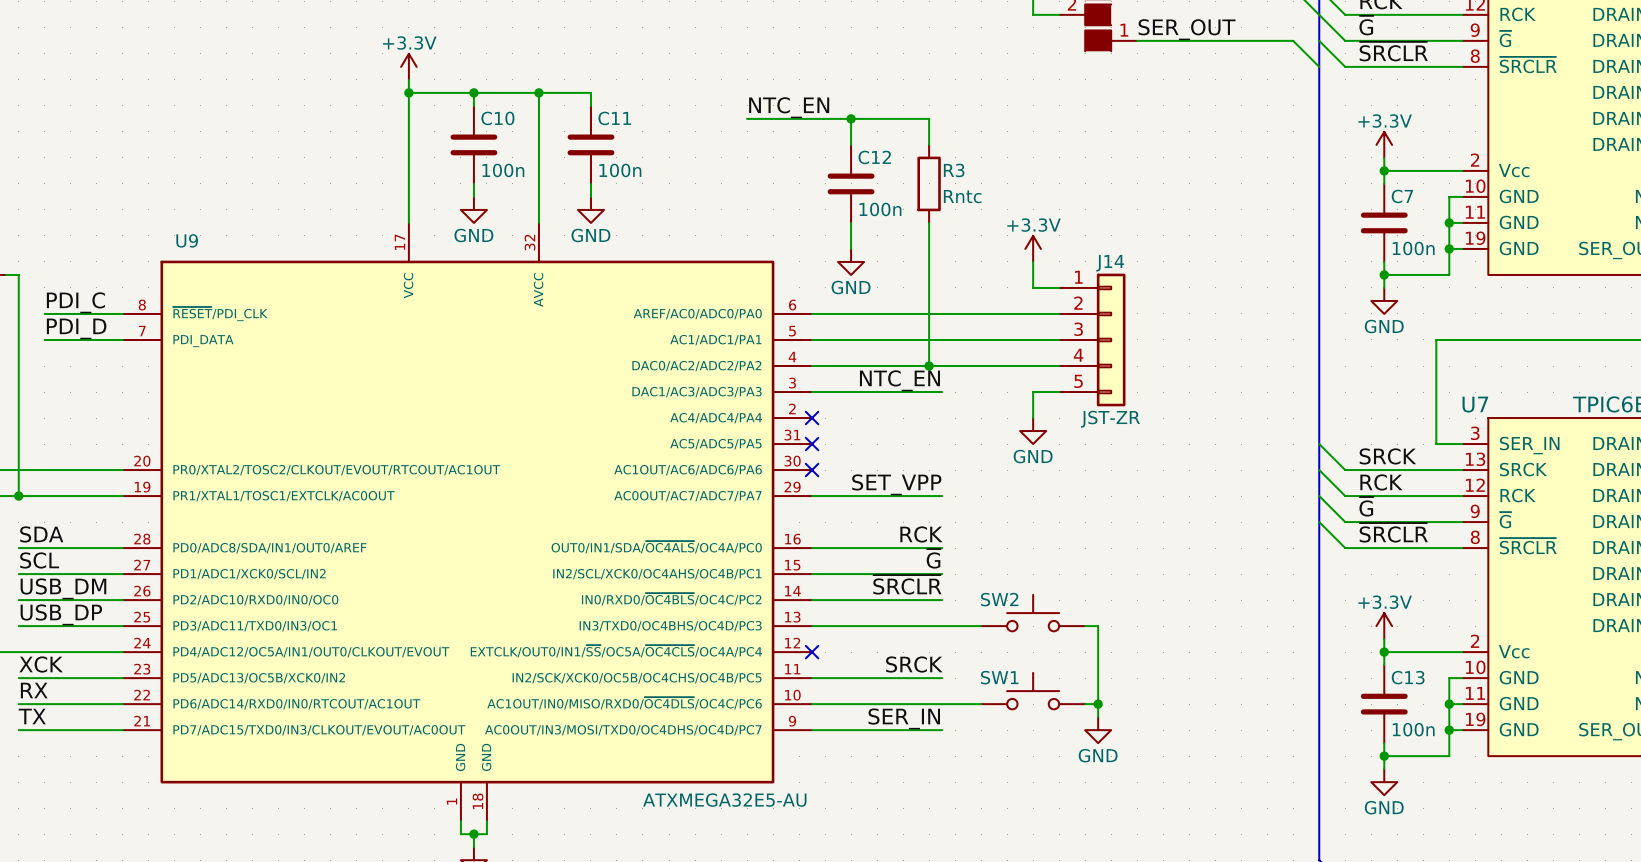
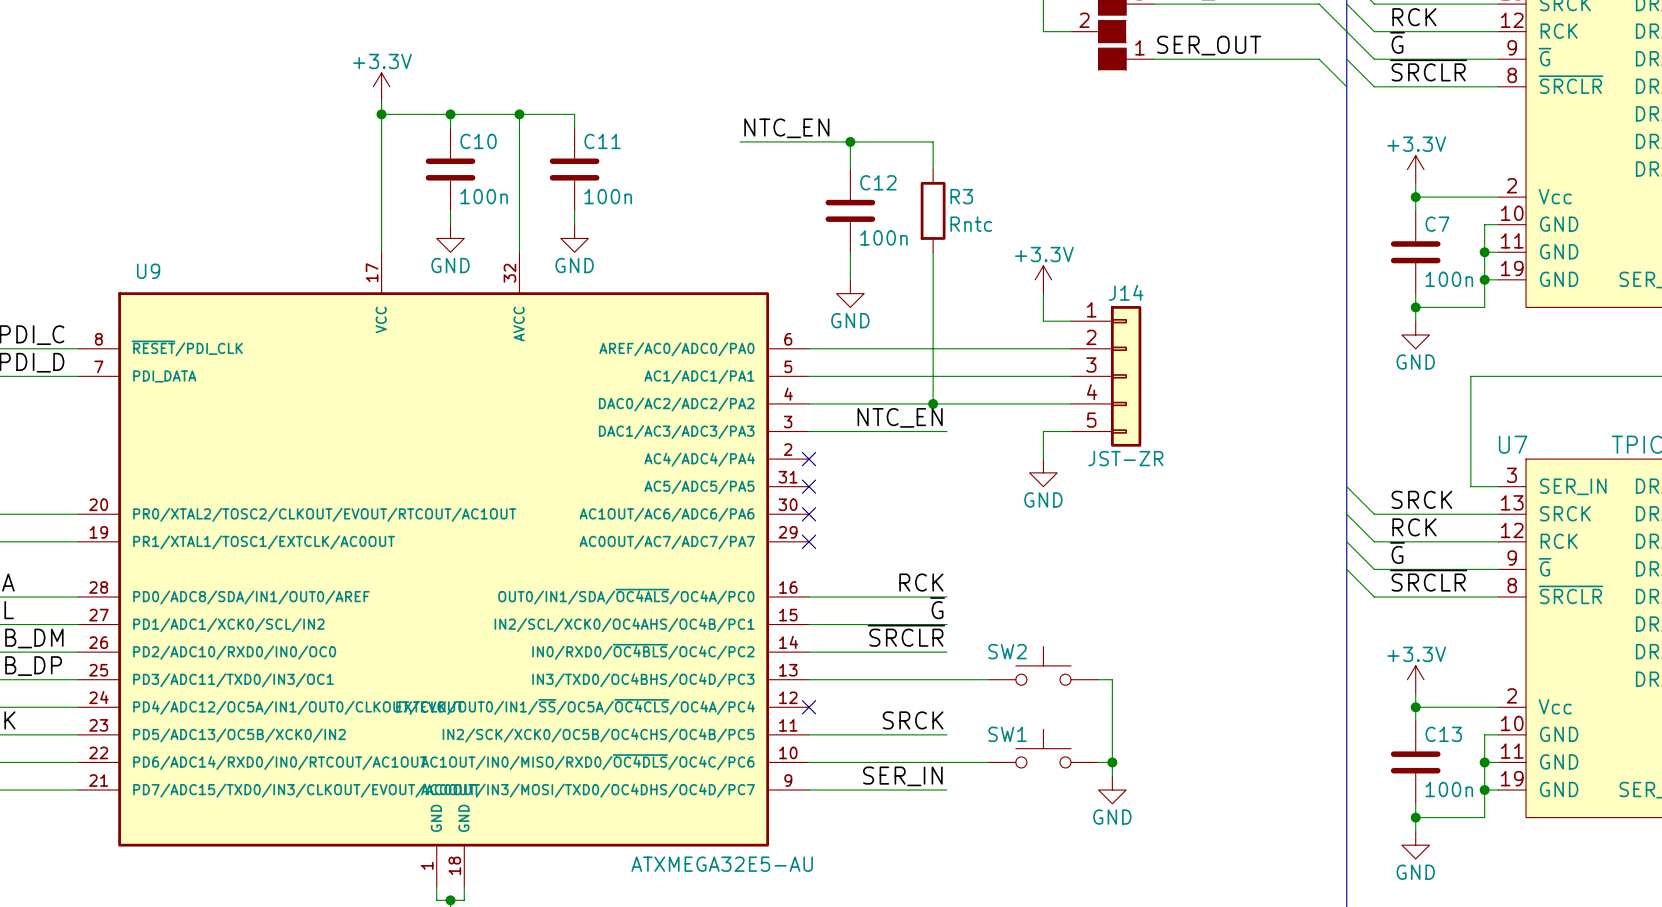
label: SET_VPP (896, 484) -> none
wire: (812, 496) (942, 496) -> none
no-connect mark: none -> (809, 541)

